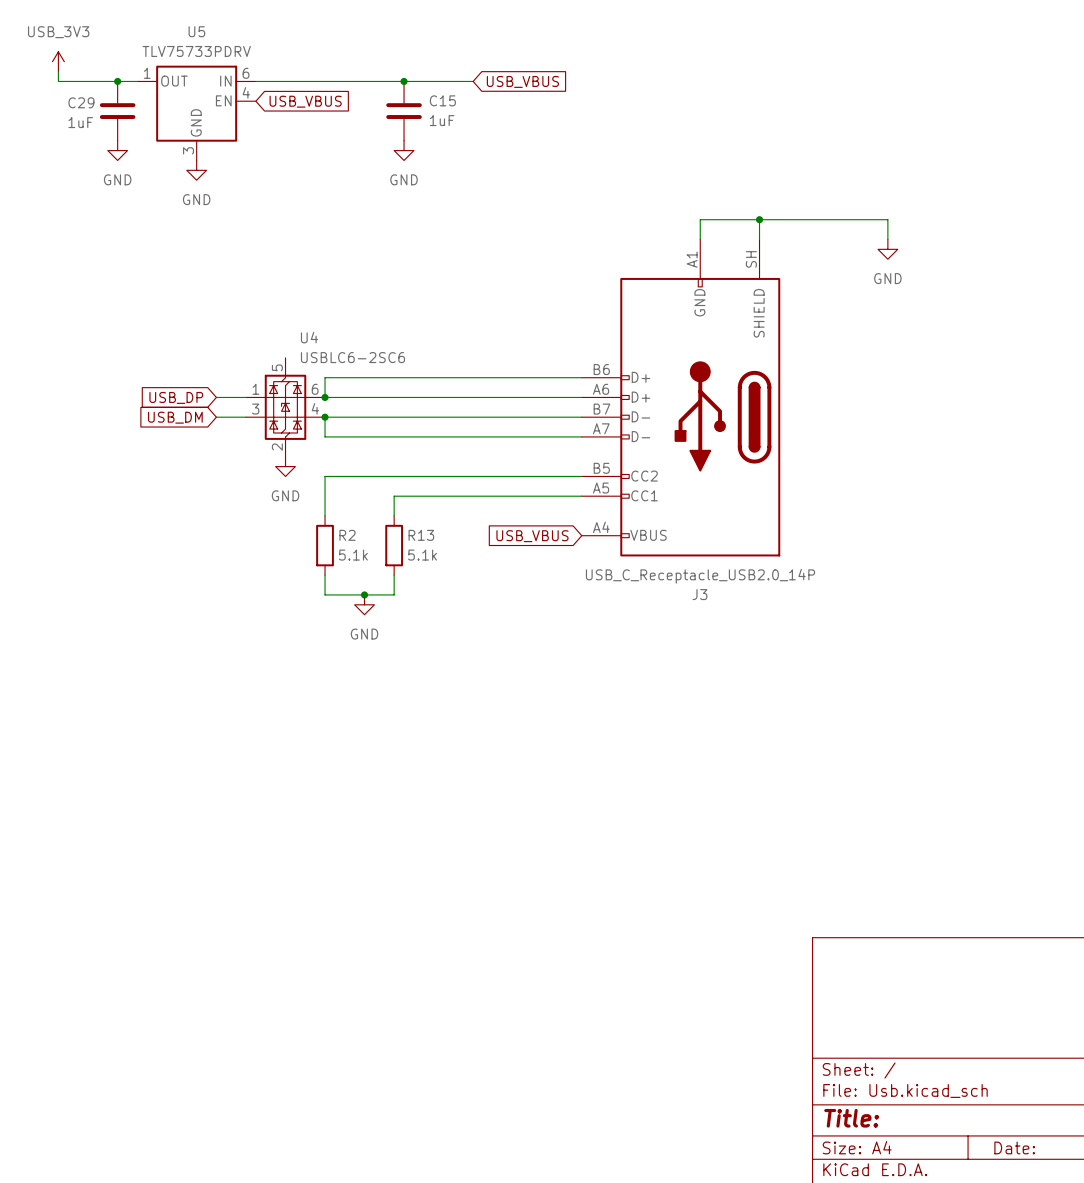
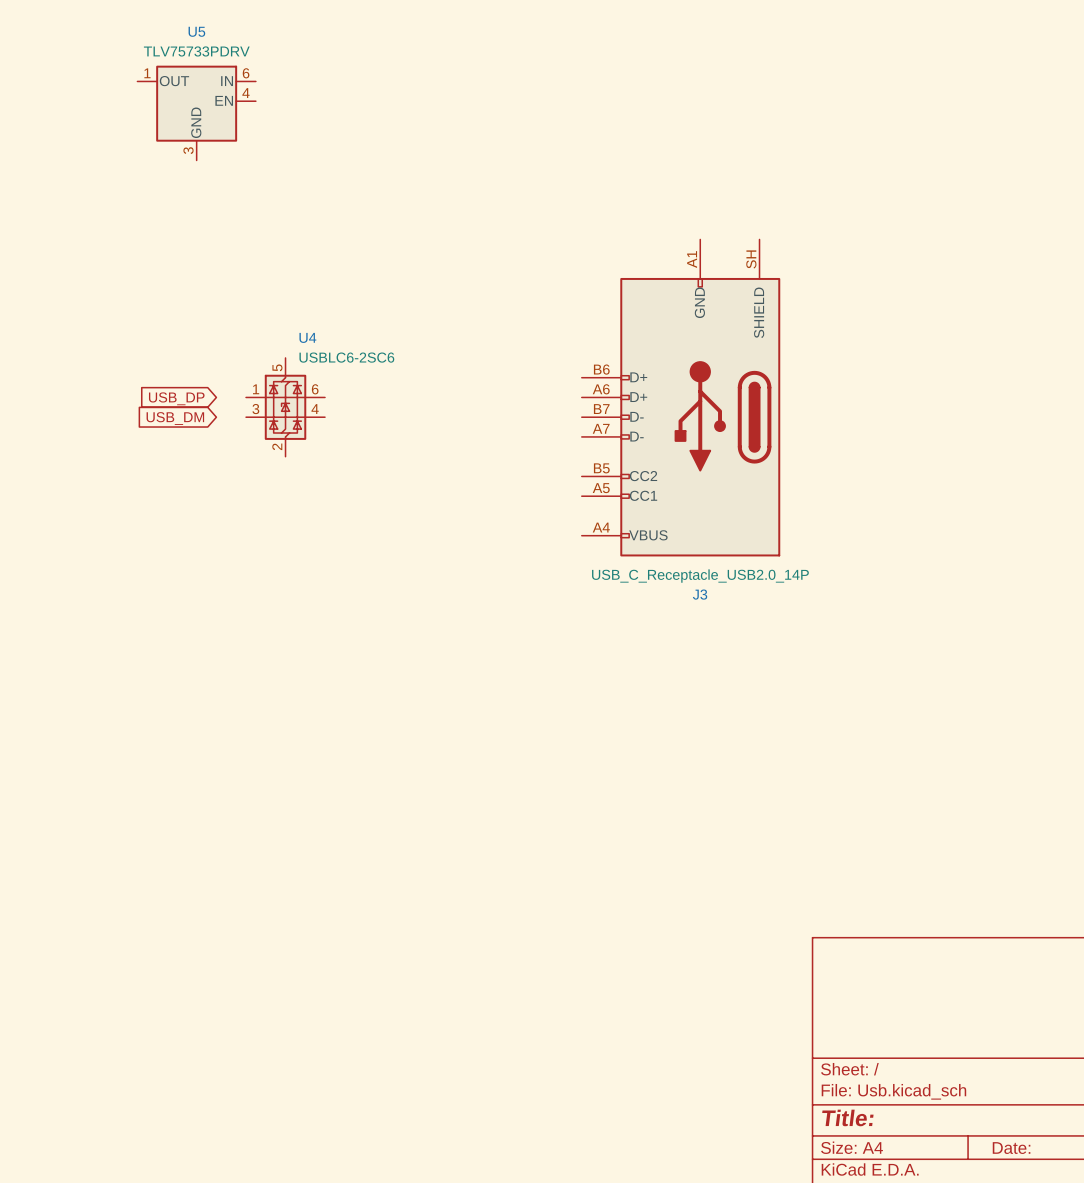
power symbol: USB_3V3 (58, 61) -> none
wire: (58, 71) (58, 81) (137, 81) -> none
junction: (117, 81) -> none
wire: (255, 81) (473, 81) -> none
junction: (404, 81) -> none
global label: USB_VBUS (522, 81) -> none
global label: USB_VBUS (305, 101) -> none
C29: 1uF (117, 111) -> none
C15: 1uF (404, 111) -> none
power symbol: GND (117, 150) -> none
power symbol: GND (404, 150) -> none
power symbol: GND (196, 170) -> none
wire: (759, 219) (759, 239) -> none
junction: (759, 219) -> none
wire: (700, 239) (700, 219) (887, 219) (887, 239) -> none
power symbol: GND (887, 249) -> none
wire: (581, 377) (325, 377) (325, 397) (581, 397) -> none
wire: (216, 397) (246, 397) -> none
junction: (325, 397) -> none
wire: (216, 417) (246, 417) -> none
junction: (325, 417) -> none
wire: (581, 417) (325, 417) (325, 436) (581, 436) -> none
power symbol: GND (285, 466) -> none
wire: (581, 476) (325, 476) (325, 515) -> none
wire: (581, 496) (394, 496) (394, 515) -> none
global label: USB_VBUS (532, 536) -> none
R2: 5.1k (325, 545) -> none
R13: 5.1k (394, 545) -> none
wire: (325, 575) (325, 594) (394, 594) (394, 575) -> none
junction: (364, 594) -> none
power symbol: GND (364, 604) -> none

